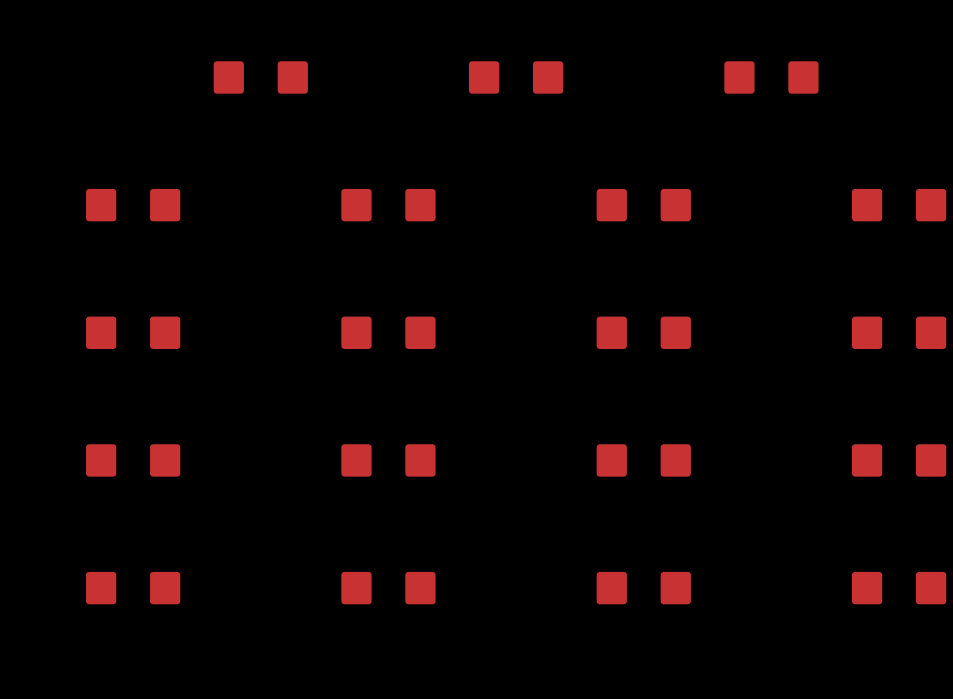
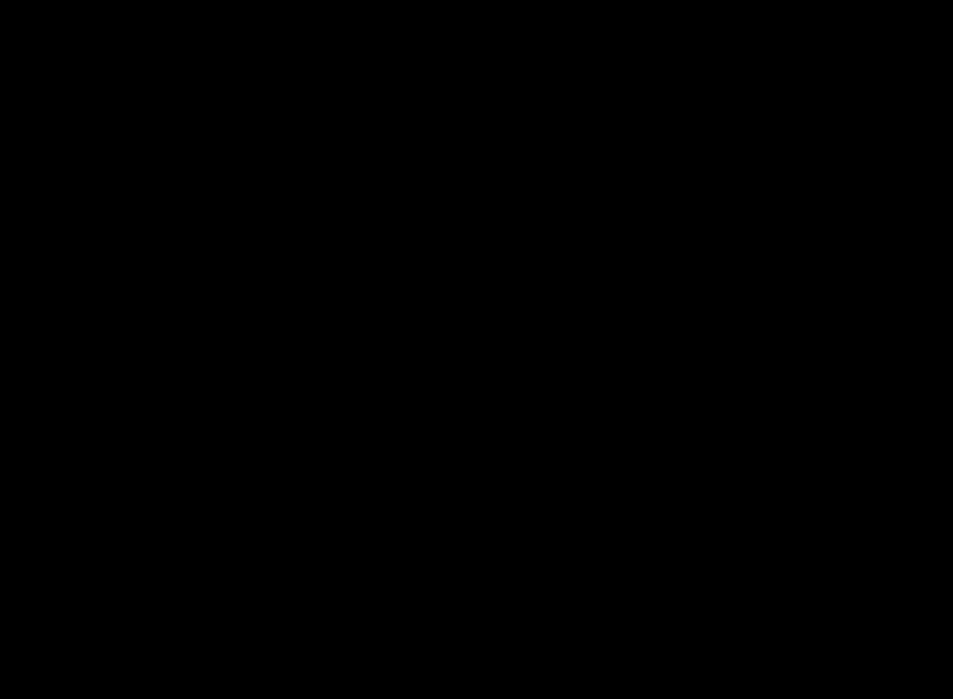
part: (260, 77) -> none
part: (516, 77) -> none
part: (771, 77) -> none
part: (133, 205) -> none
part: (388, 205) -> none
part: (643, 205) -> none
part: (899, 205) -> none
part: (133, 332) -> none
part: (388, 332) -> none
part: (643, 332) -> none
part: (899, 332) -> none
part: (133, 460) -> none
part: (388, 460) -> none
part: (643, 460) -> none
part: (899, 460) -> none
part: (133, 588) -> none
part: (388, 588) -> none
part: (643, 588) -> none
part: (899, 588) -> none

